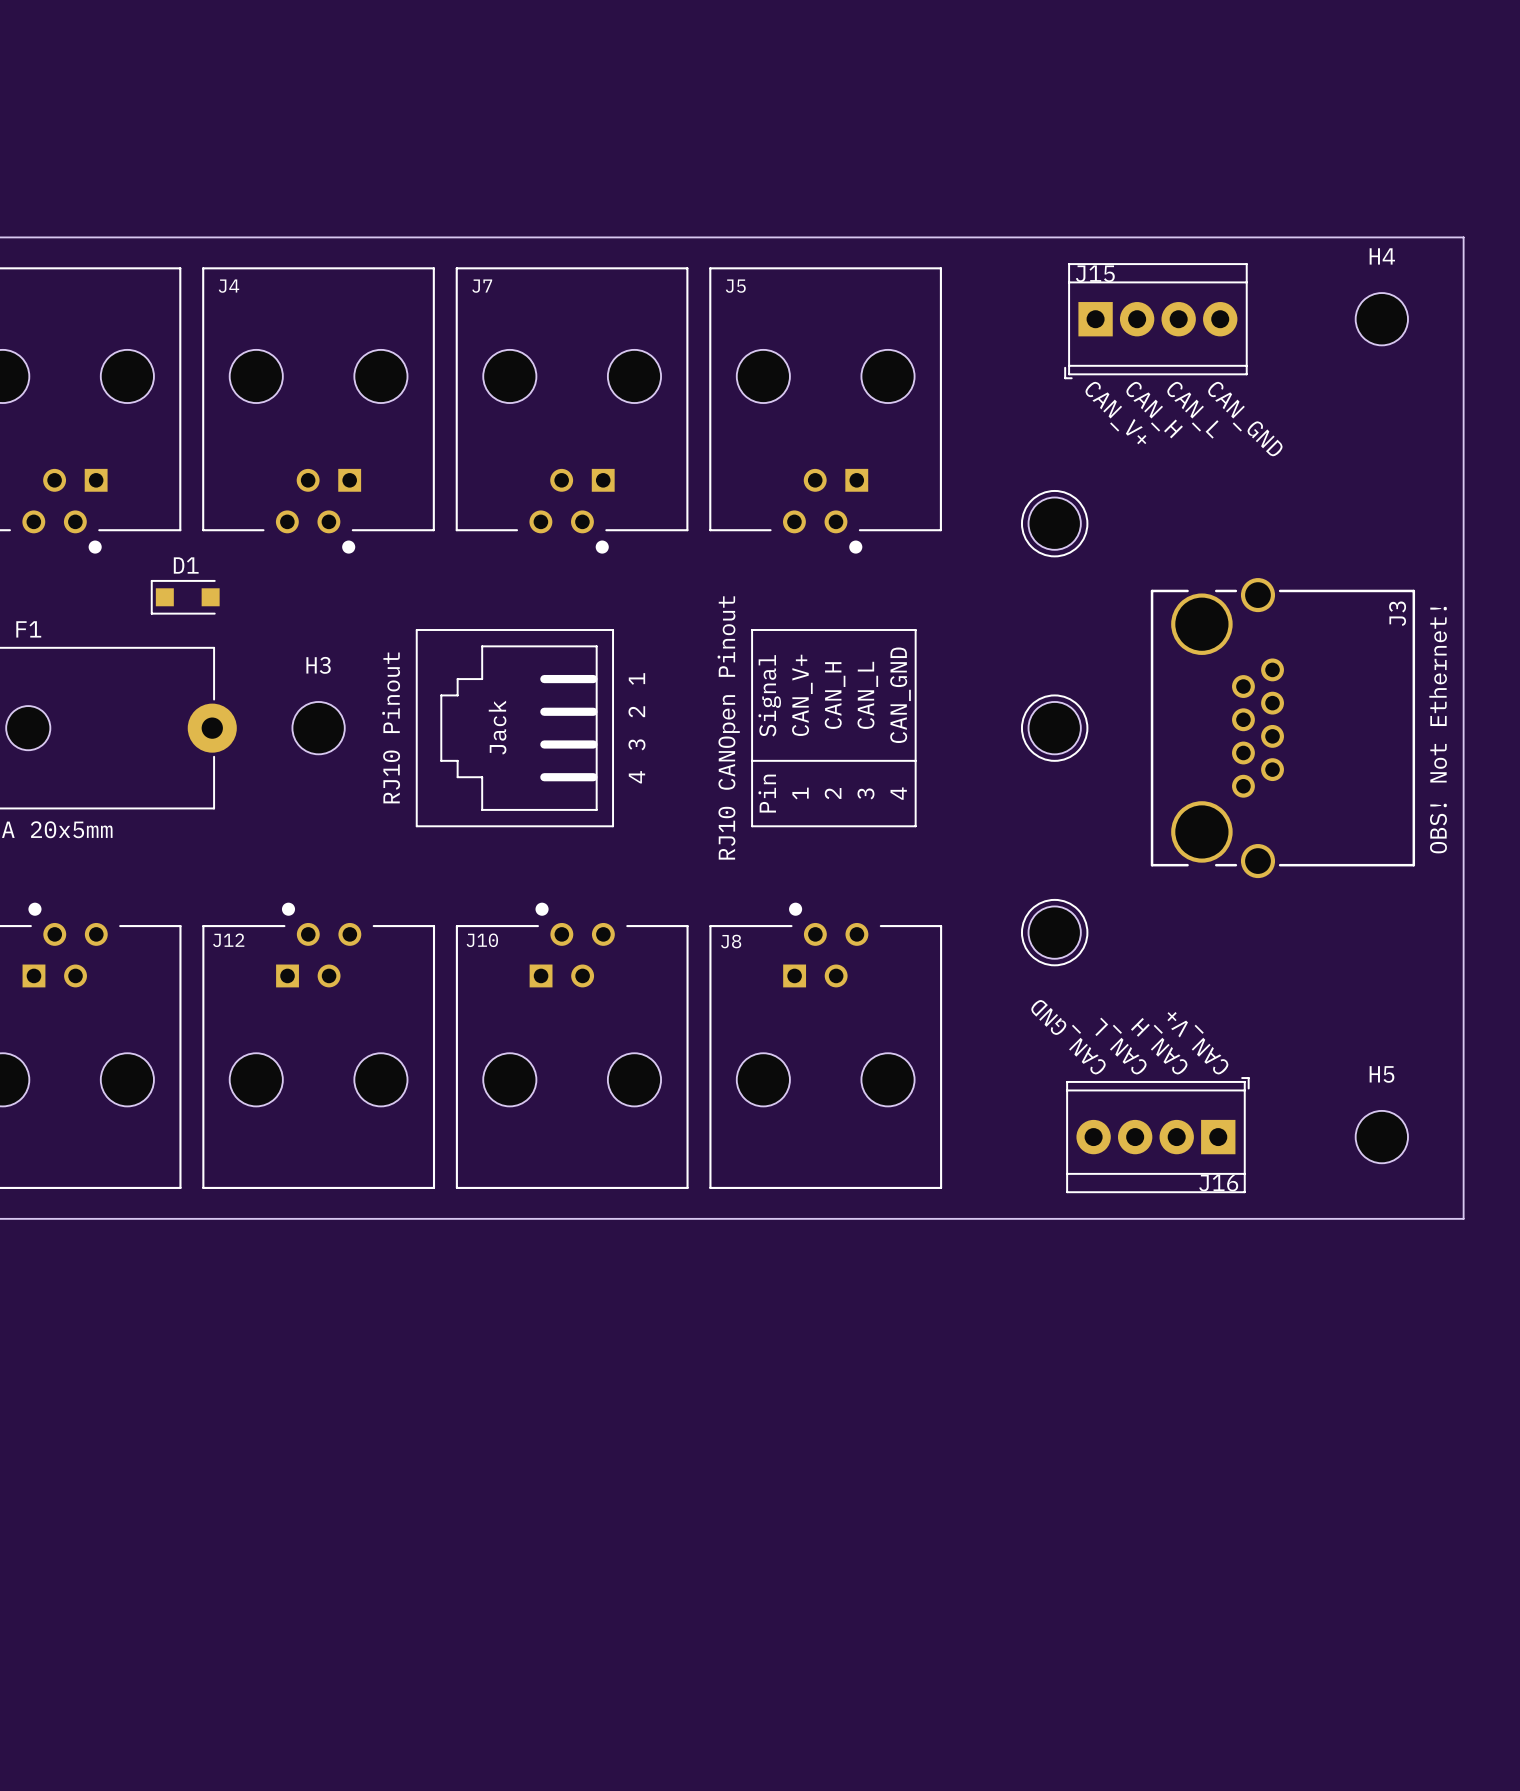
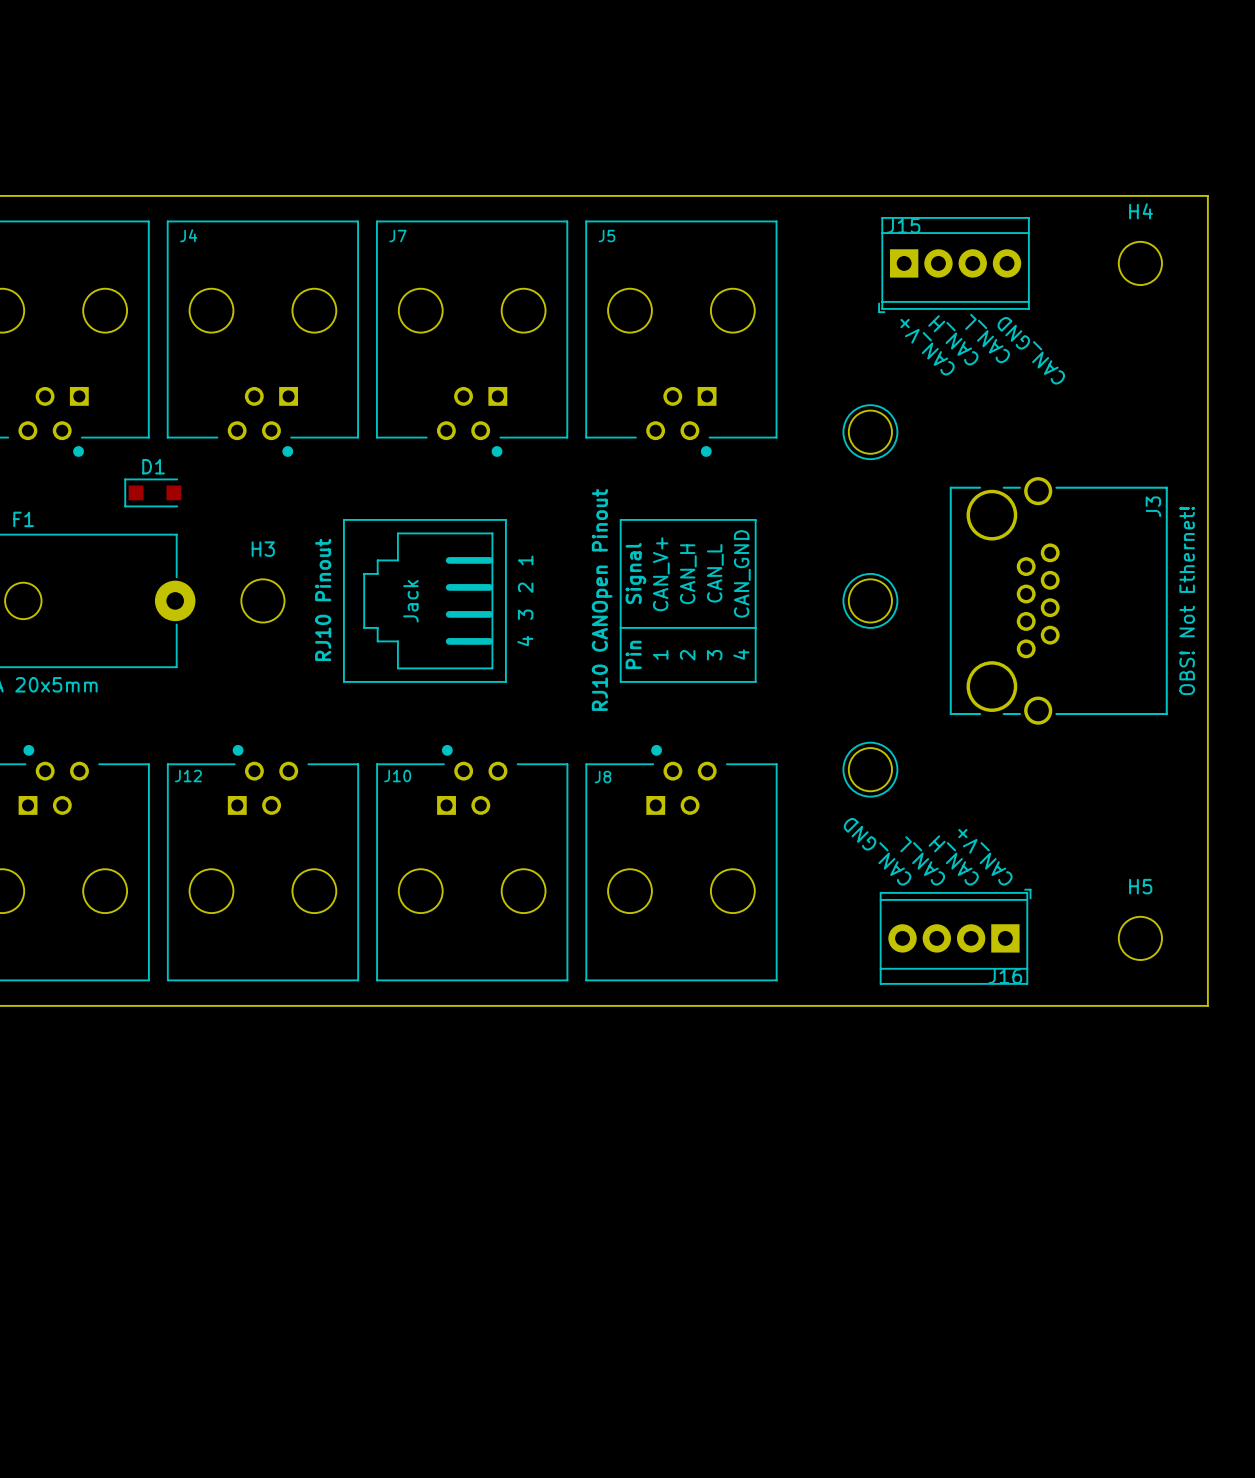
text rotation: 0° (1154, 409) -> 180° (953, 340)
text rotation: 0° (1192, 410) -> 180° (987, 338)
text rotation: 0° (1115, 412) -> 180° (927, 347)
text rotation: 0° (1245, 419) -> 180° (1031, 350)

